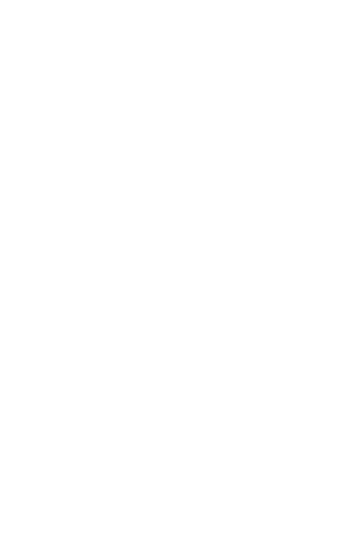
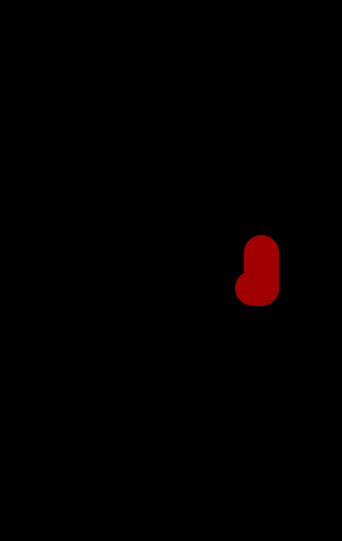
track: none -> (261, 252) (261, 288) (252, 288)

